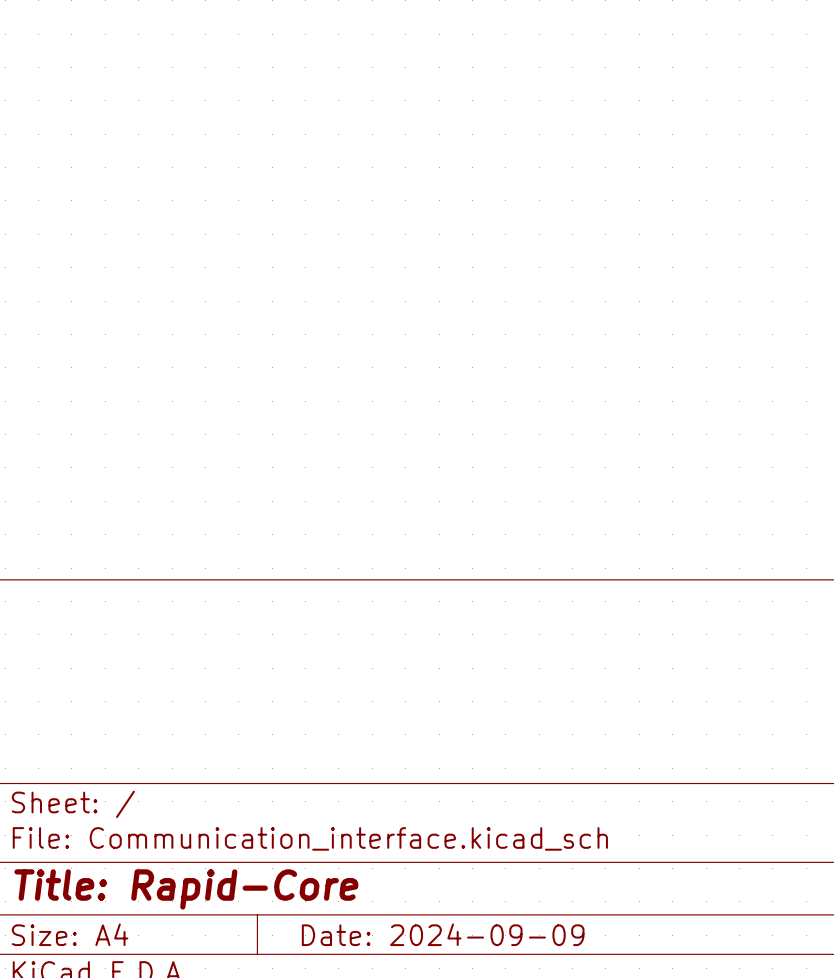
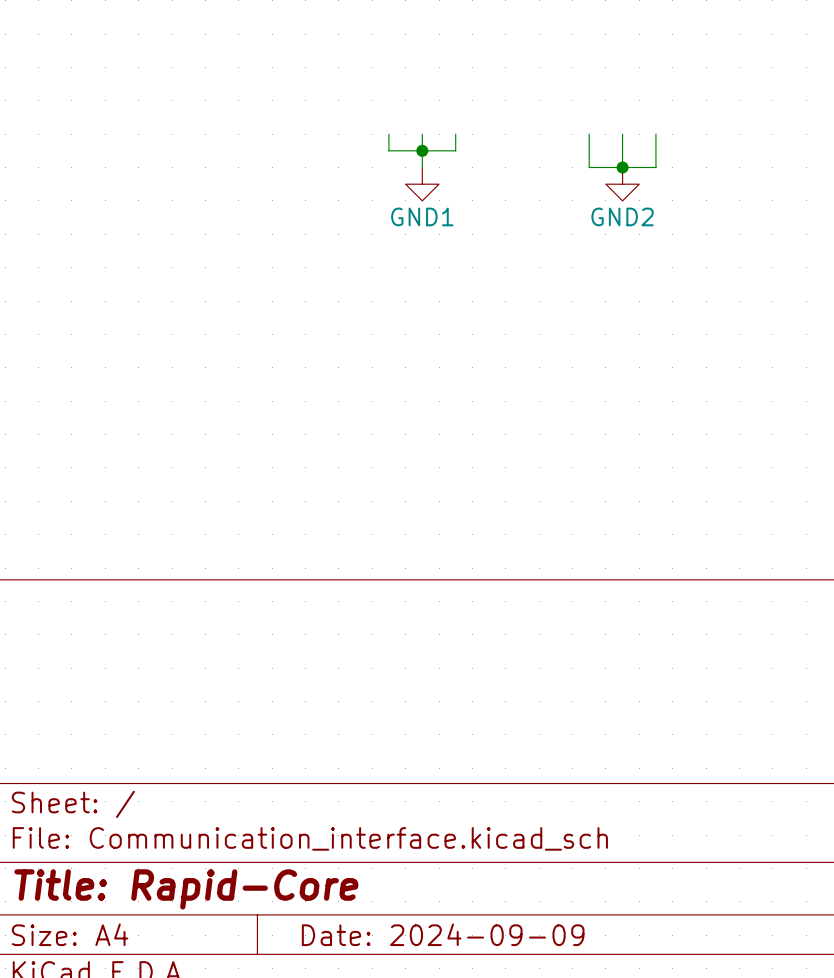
wire: none -> (388, 134) (388, 150) (455, 150) (455, 134)
wire: none -> (422, 134) (422, 167)
wire: none -> (589, 134) (589, 167) (655, 167) (655, 134)
wire: none -> (622, 134) (622, 167)
junction: none -> (422, 150)
junction: none -> (622, 167)
power symbol: none -> GND1 (422, 184)
power symbol: none -> GND2 (622, 184)

